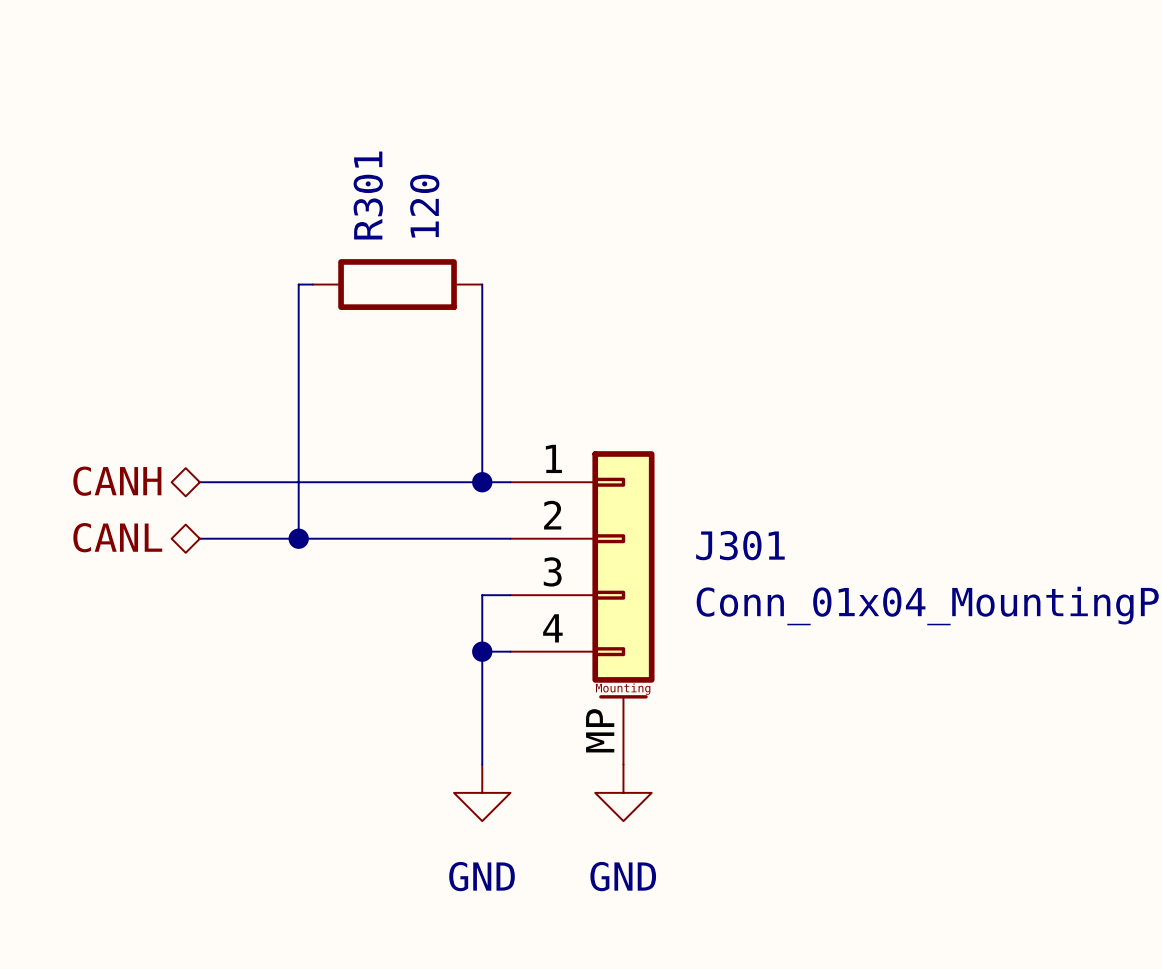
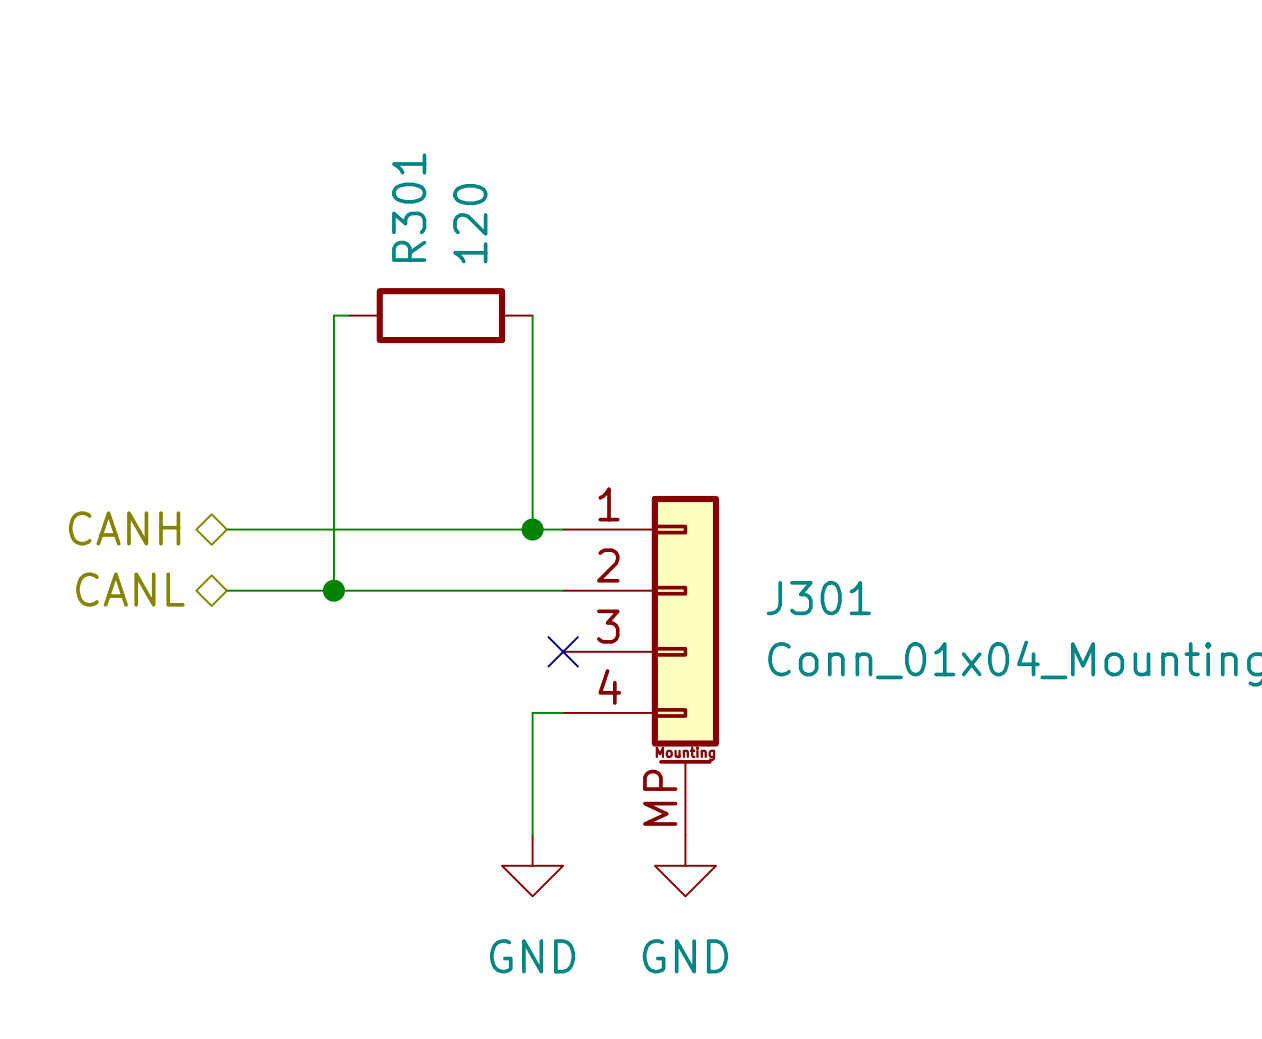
wire: (510, 595) (482, 595) (482, 651) -> none
no-connect mark: none -> (563, 651)
junction: (482, 651) -> none

